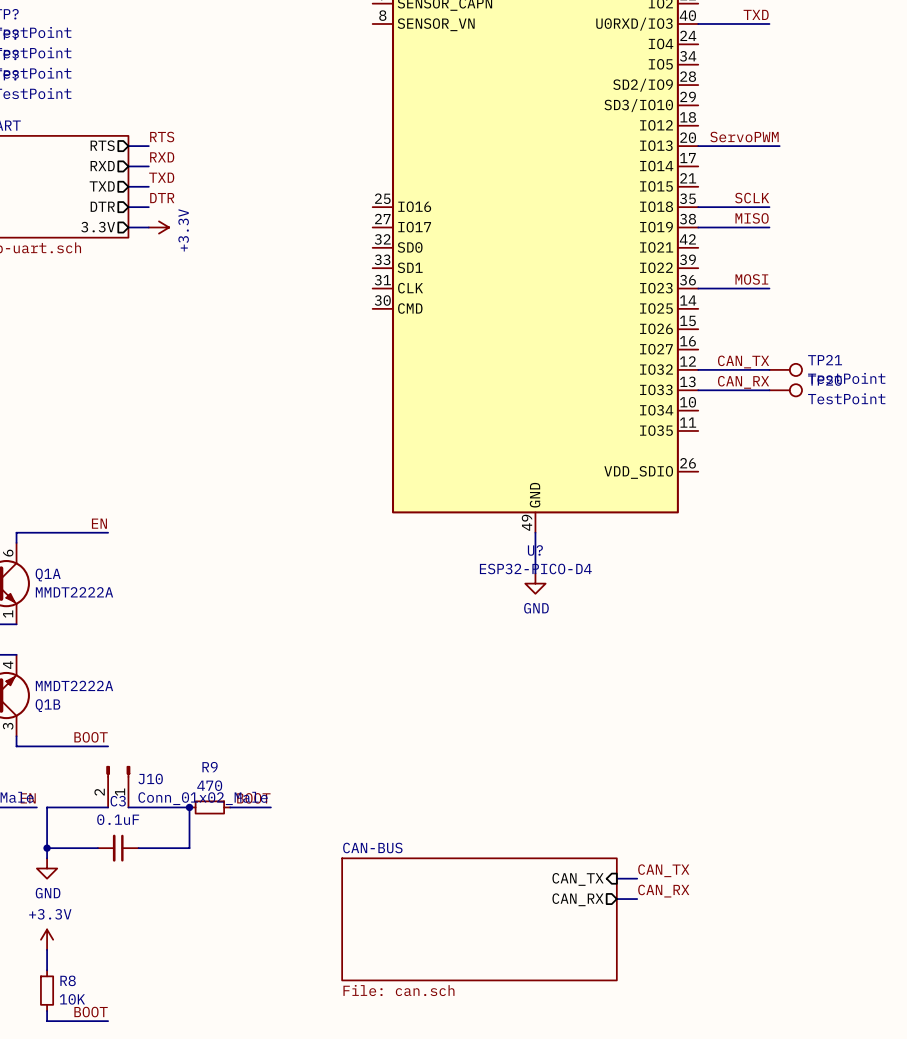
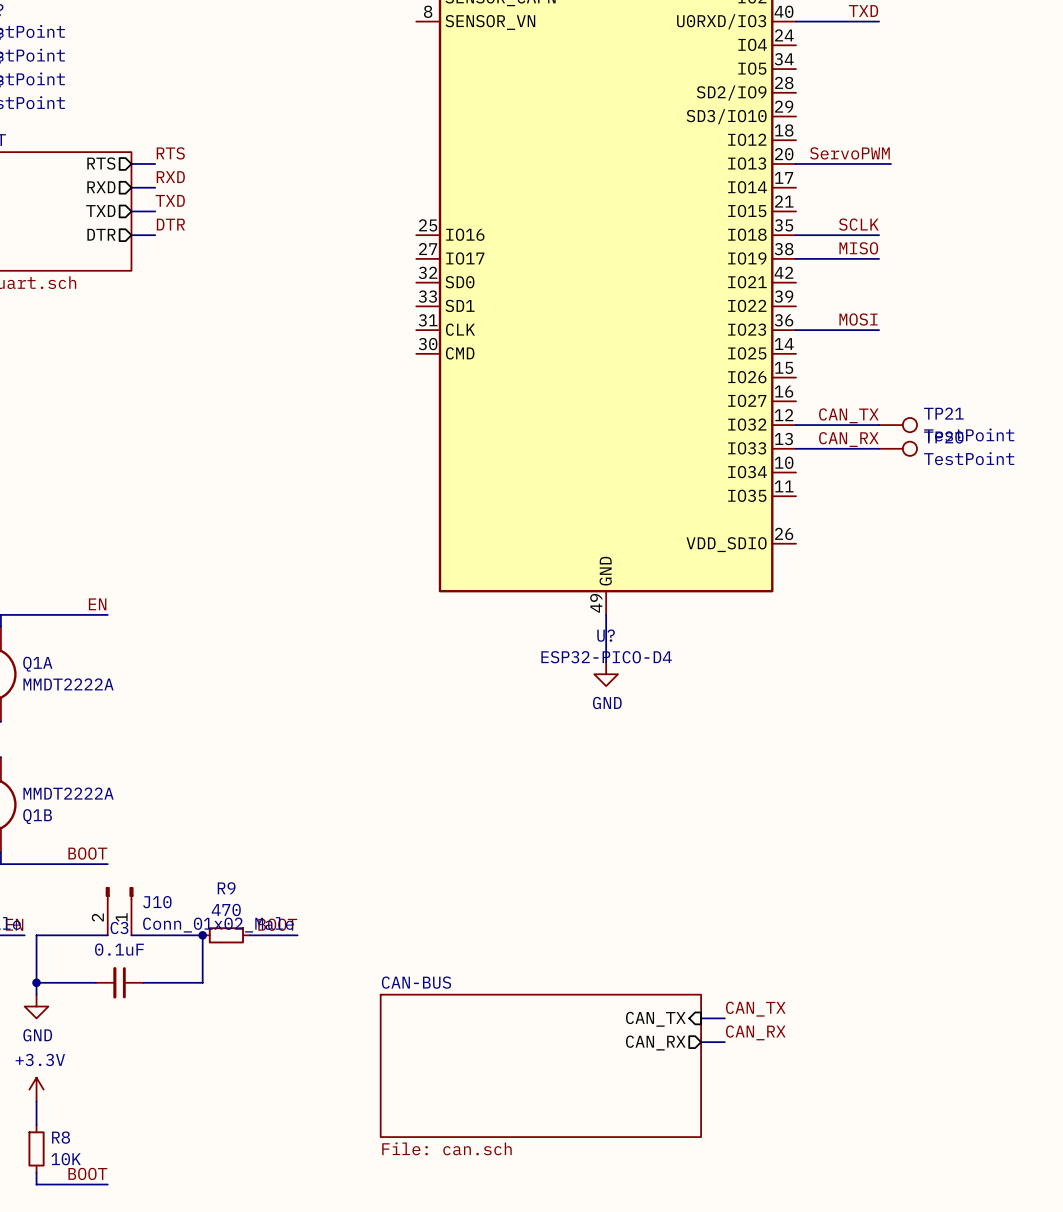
sheet pin: 3.3V (98, 227) -> none
wire: (128, 227) (148, 227) -> none
power symbol: +3.3V (158, 227) -> none

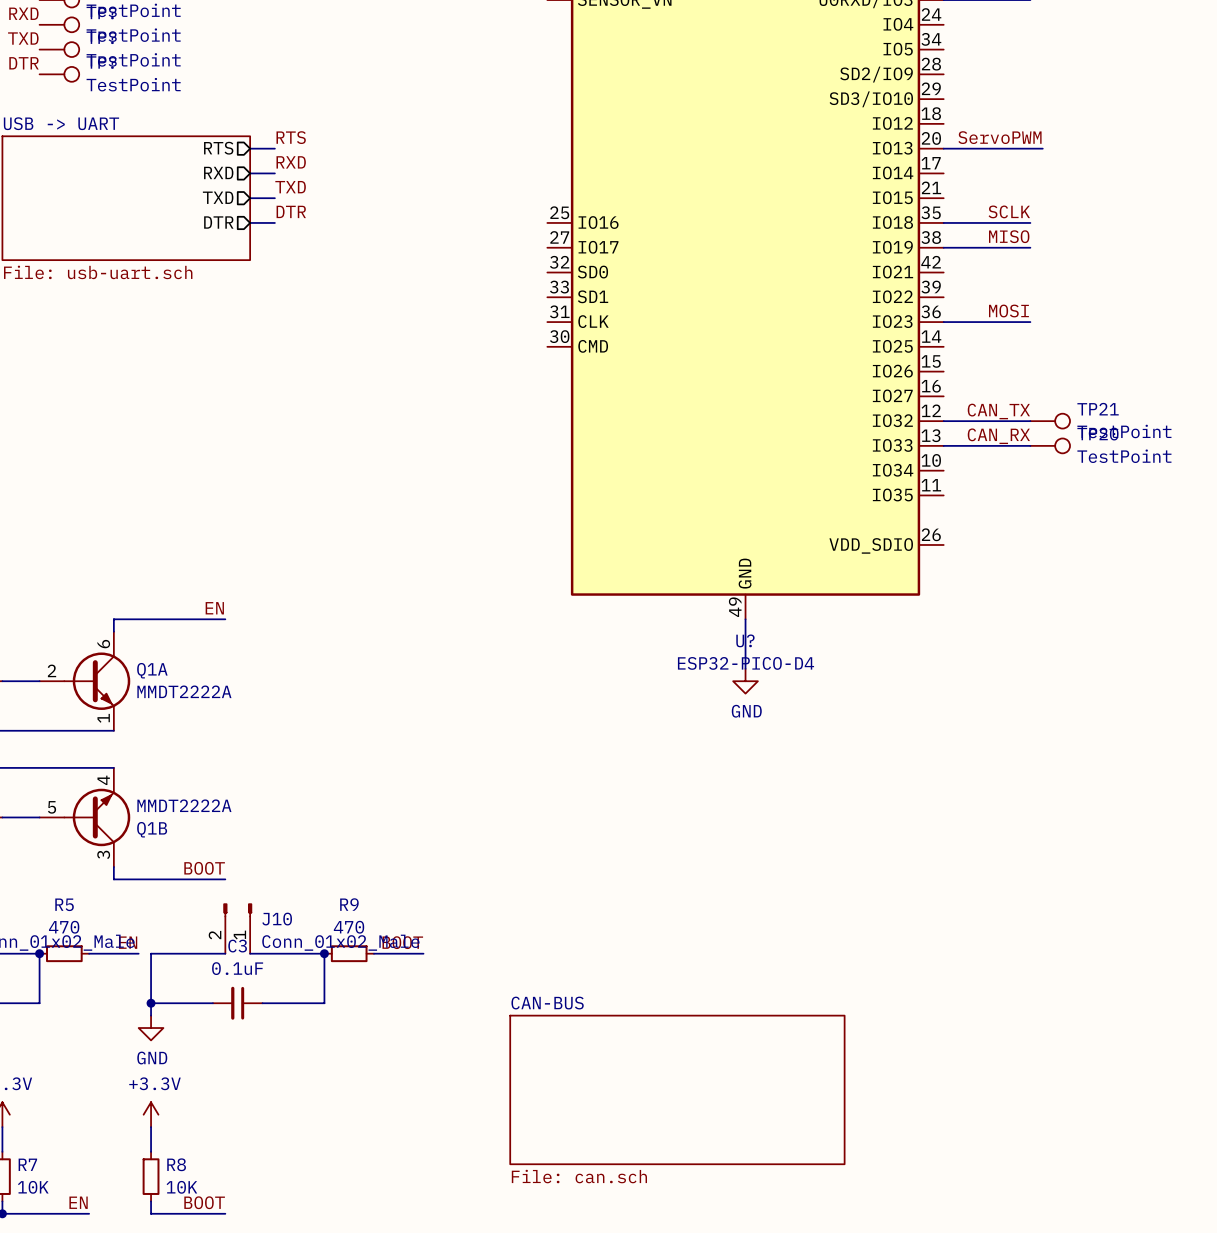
label: CAN_TX (755, 1009) -> none
wire: (701, 1018) (724, 1018) -> none
sheet pin: CAN_TX (655, 1019) -> none
label: CAN_RX (755, 1032) -> none
wire: (701, 1042) (724, 1042) -> none
sheet pin: CAN_RX (655, 1043) -> none

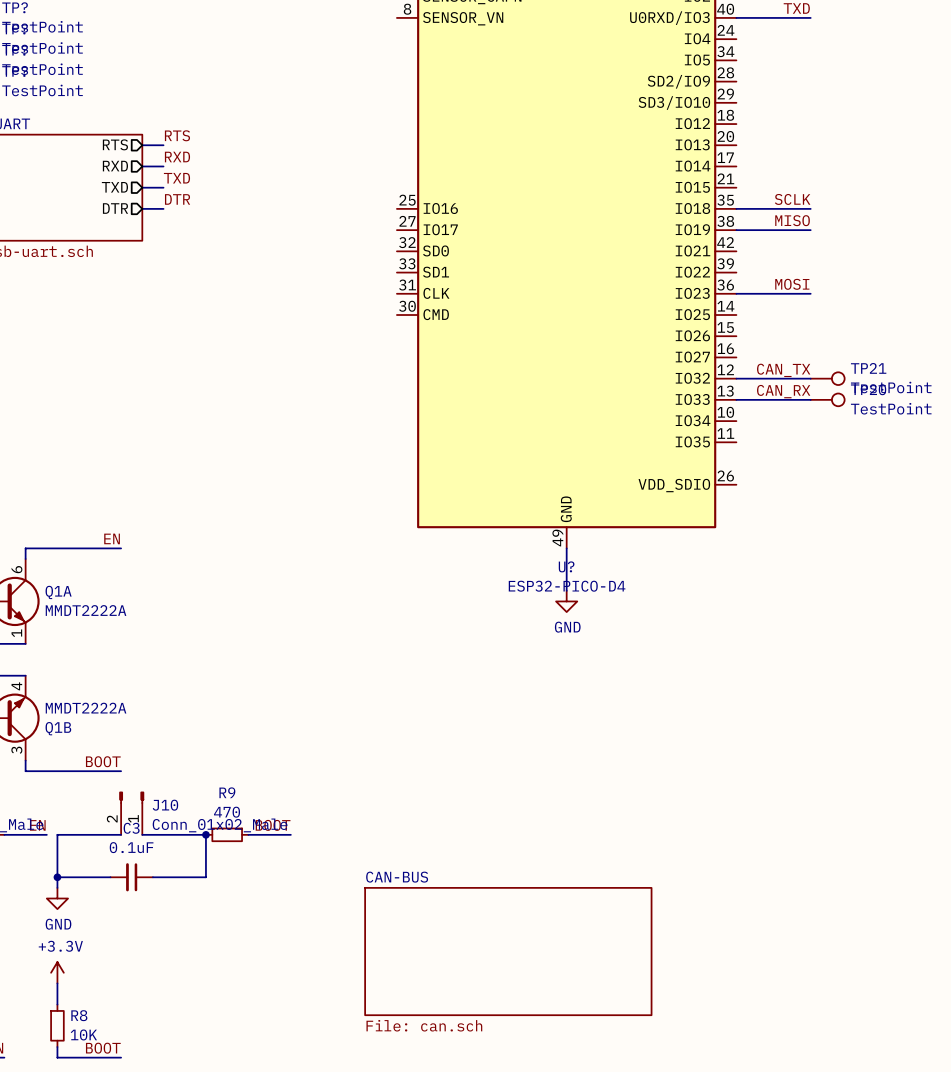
label: ServoPWM (999, 137) -> none
wire: (943, 148) (1042, 148) -> none

